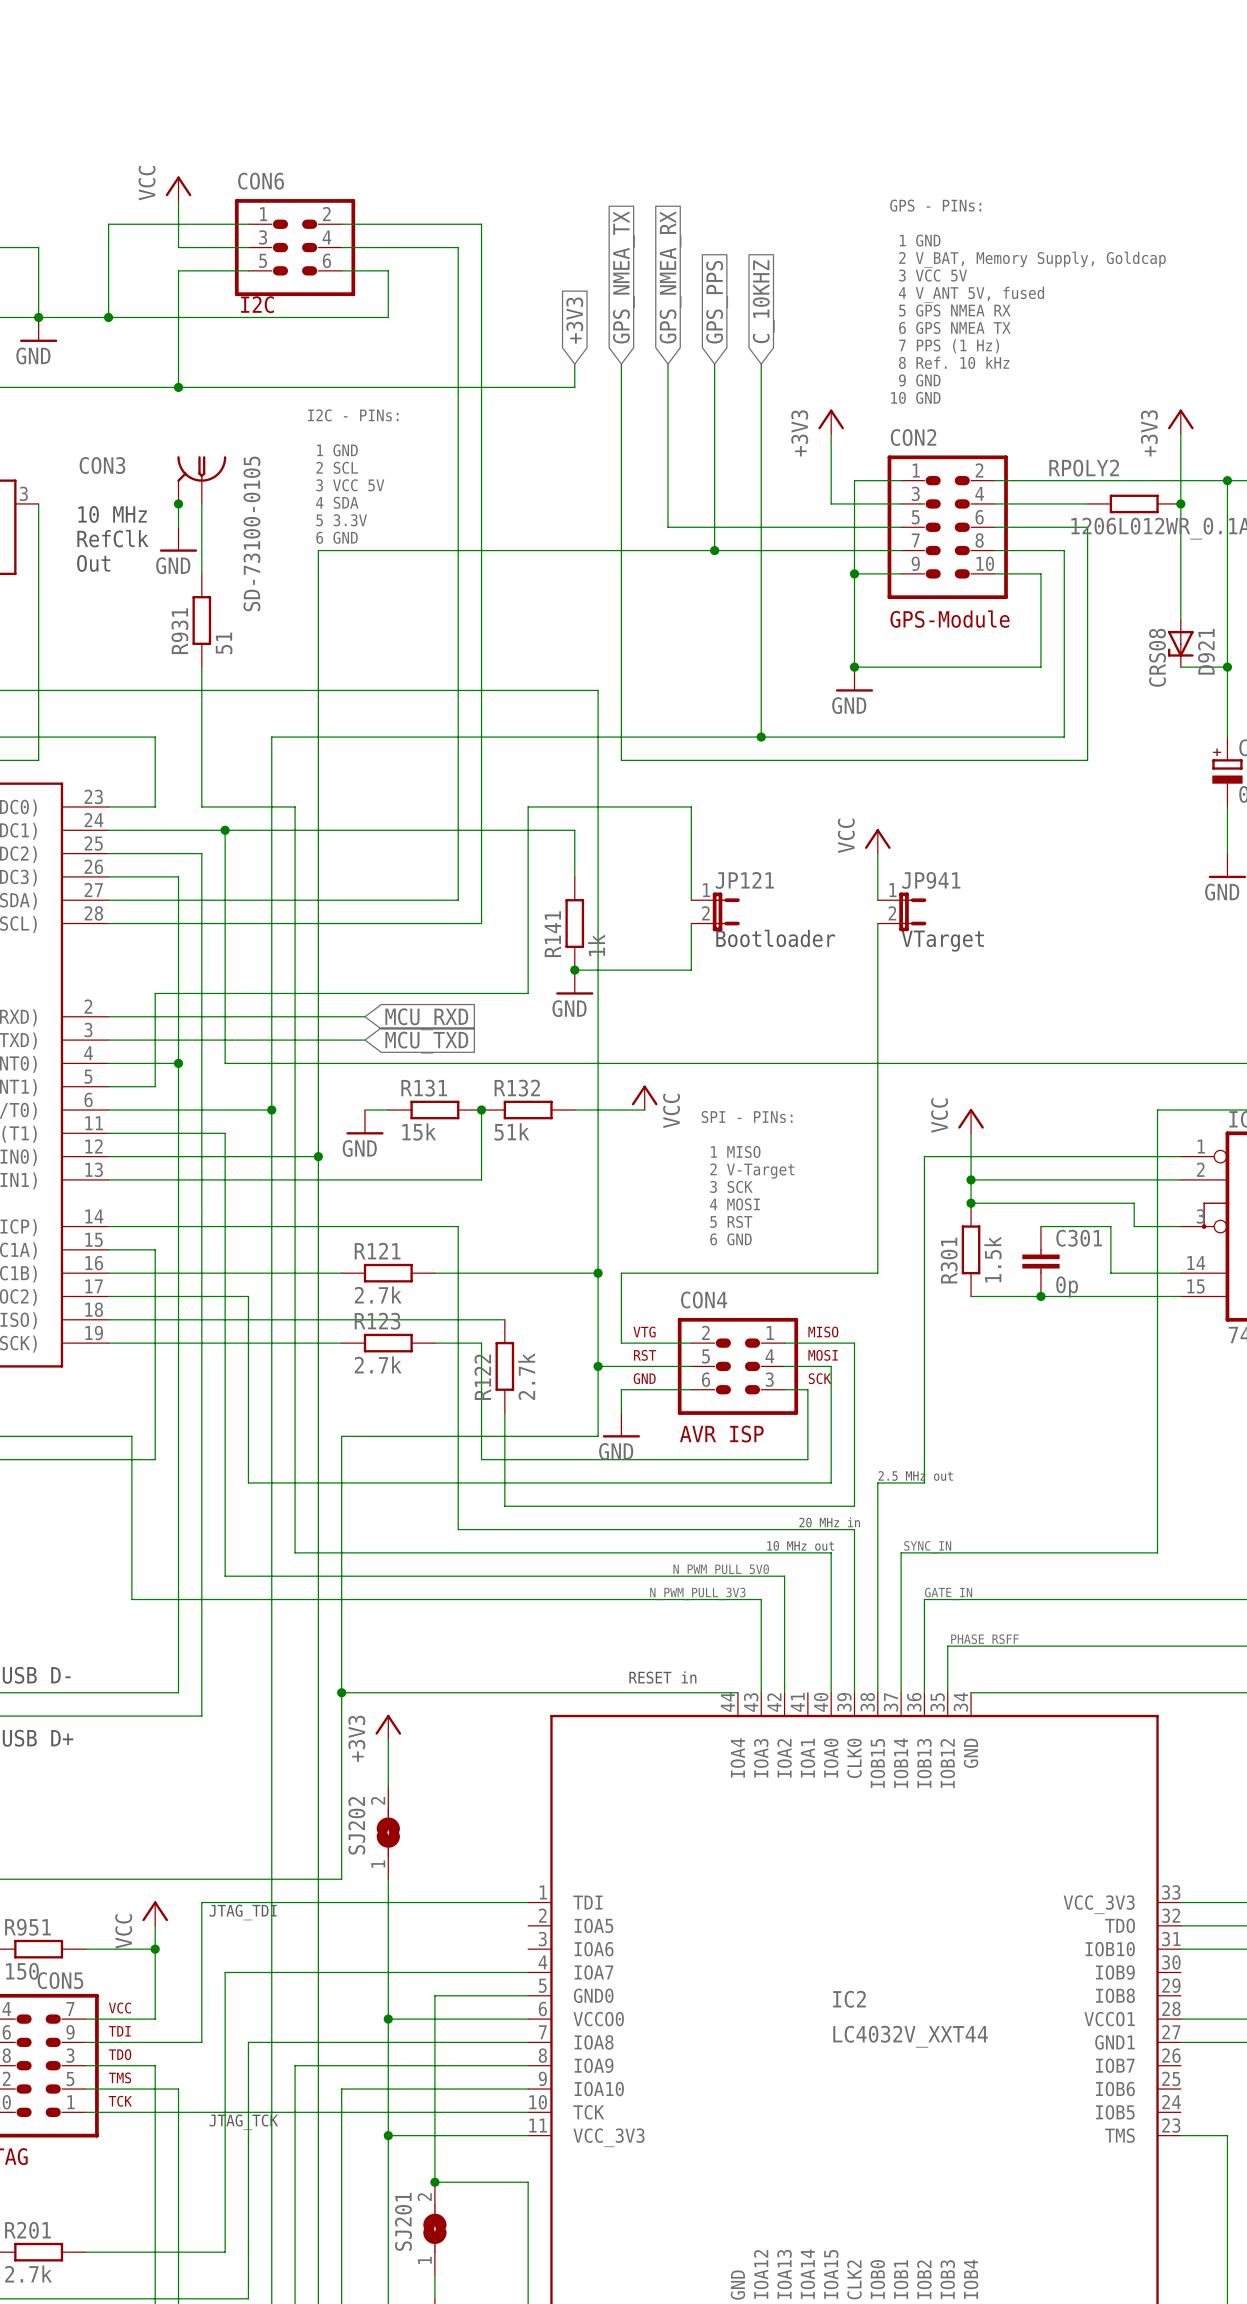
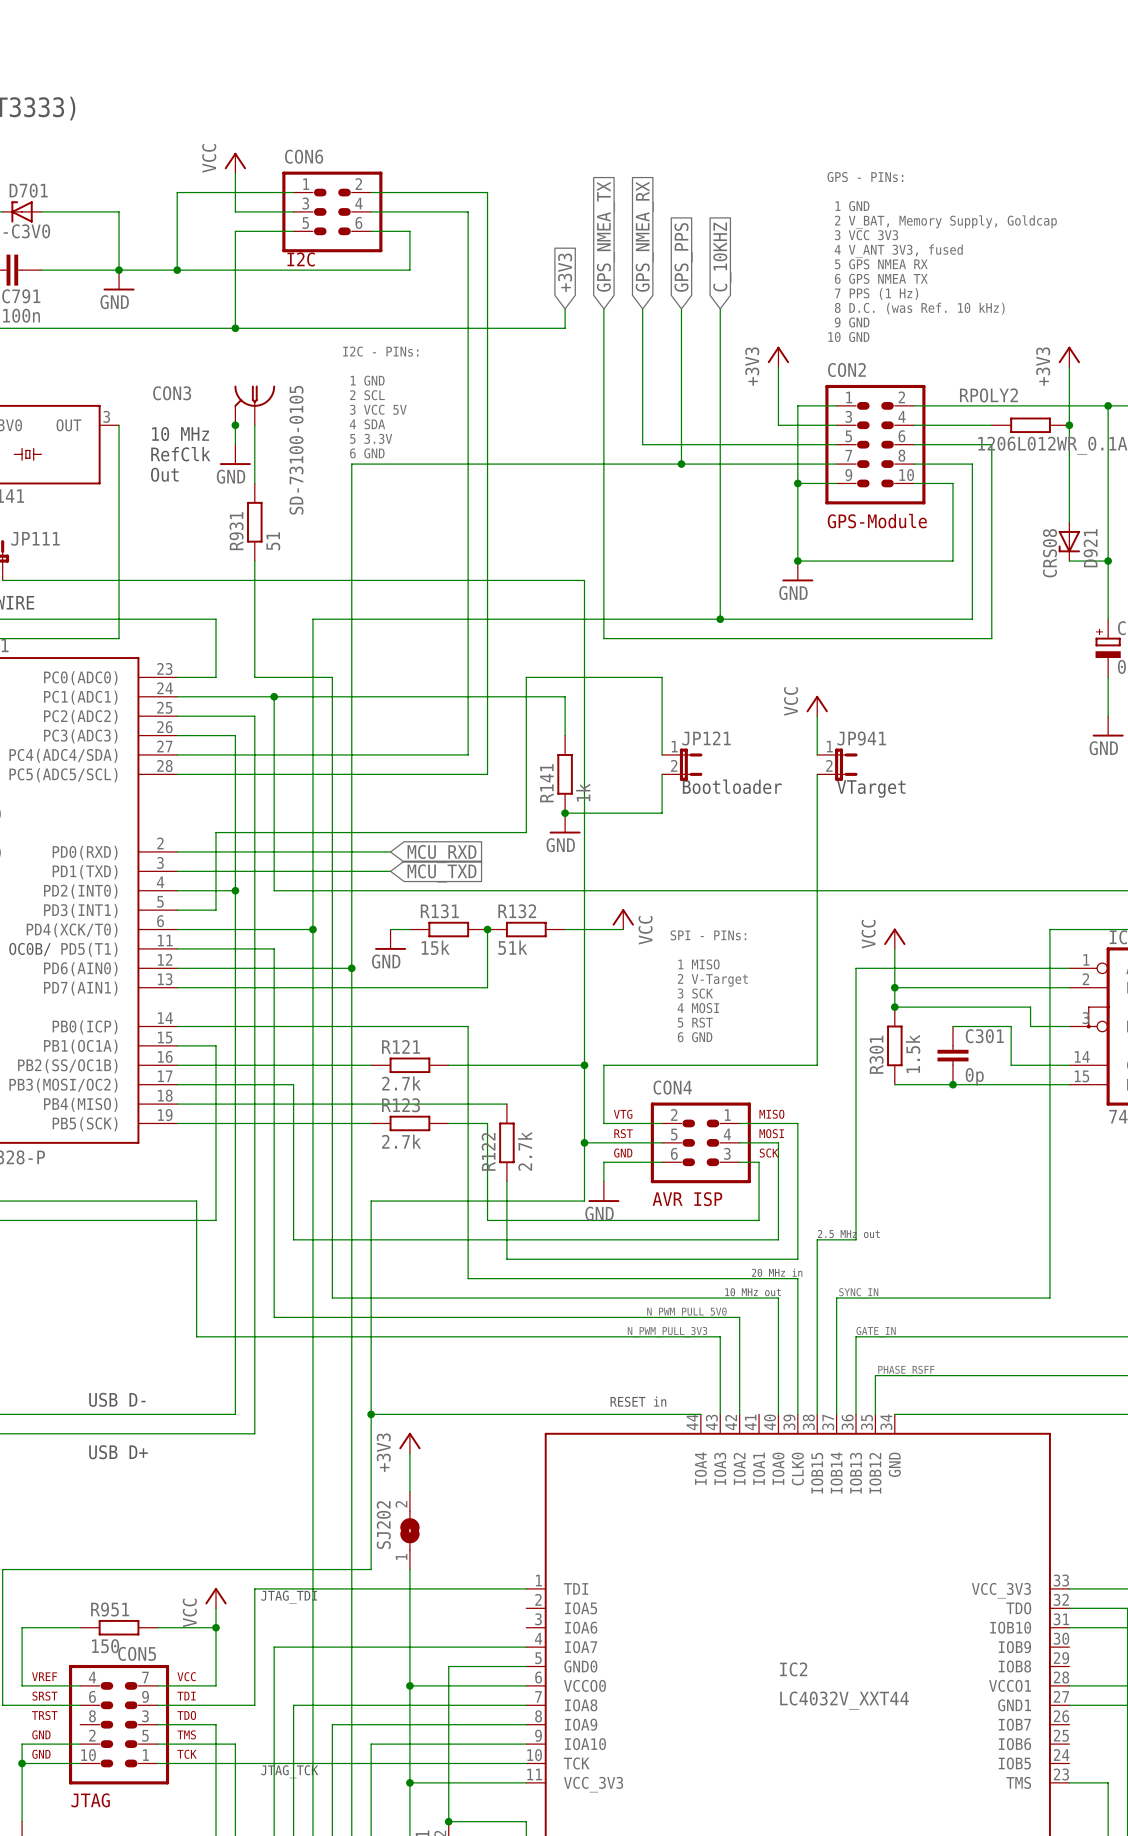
text: 3 VCC 5V (933, 275) -> 3 VCC 3V3 (866, 235)
text: 4 V_ANT 5V, fused (971, 294) -> 4 V_ANT 3V3, fused (898, 251)
text: 8 Ref. 10 kHz (954, 362) -> 8 D.C. (was Ref. 10 kHz) (919, 308)

